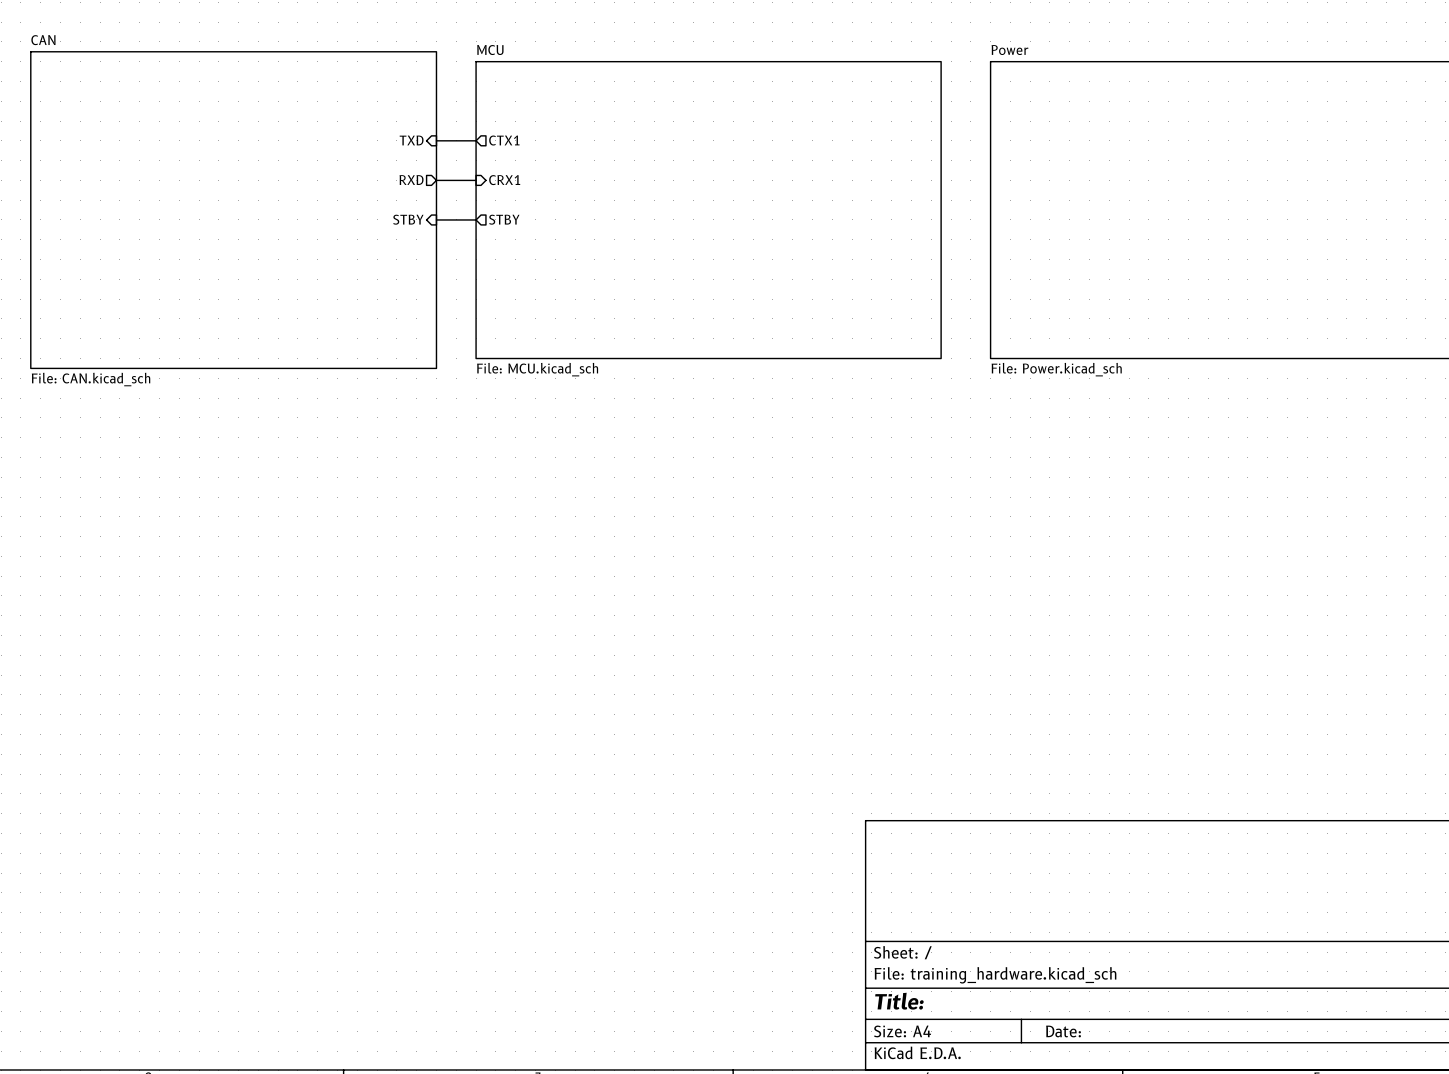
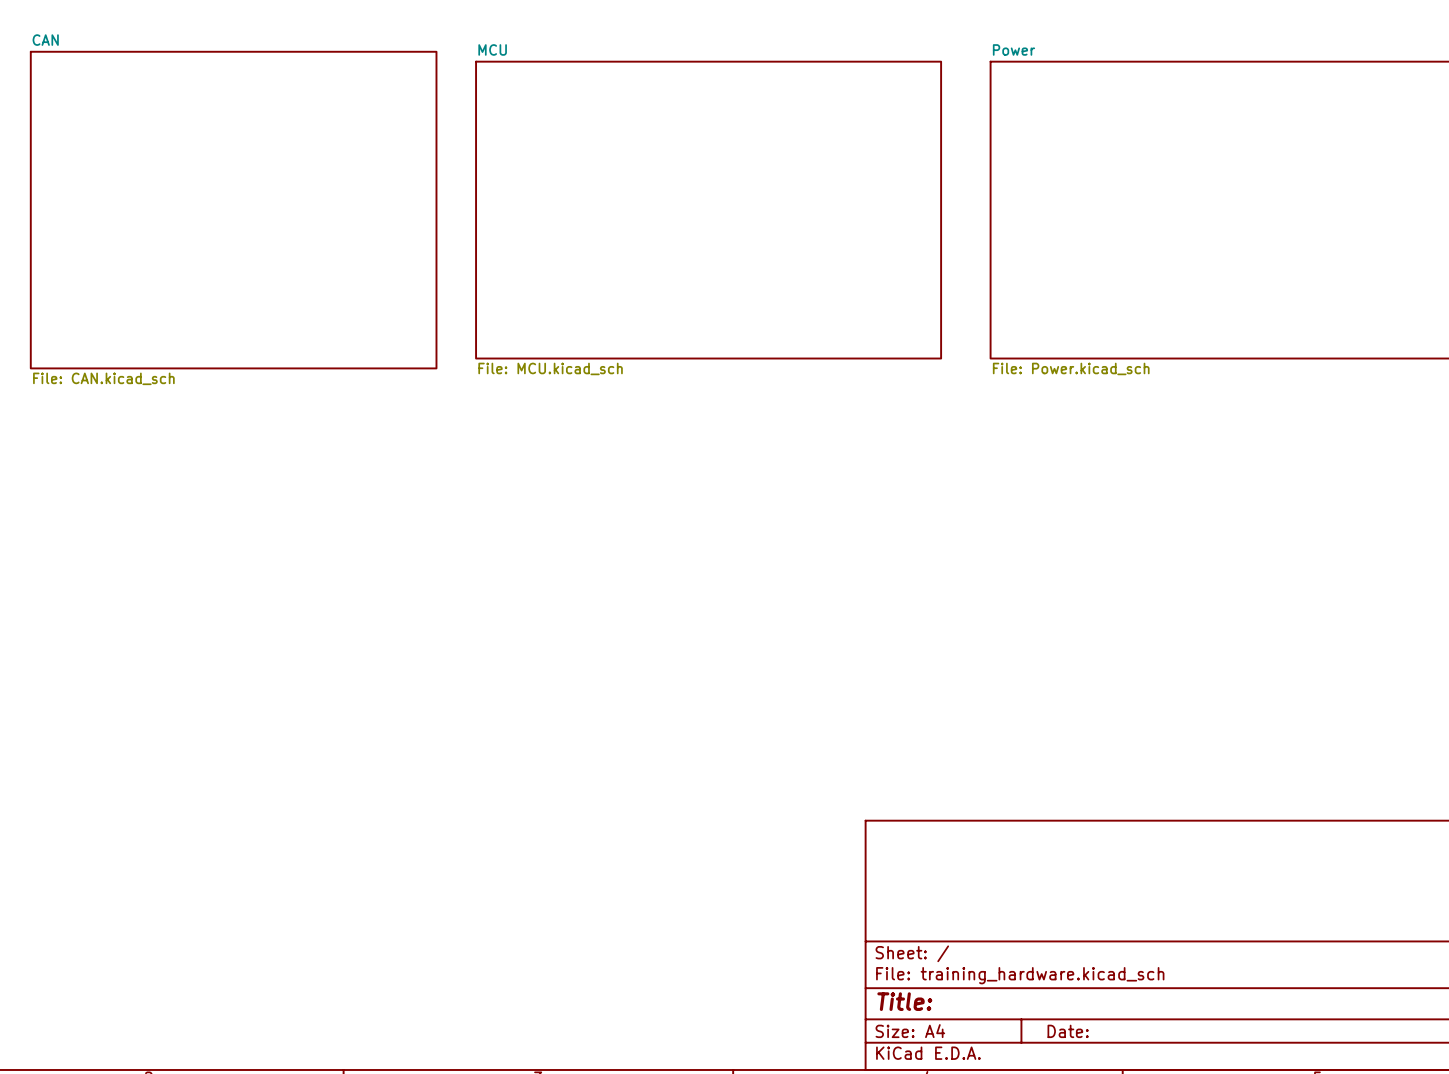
sheet pin: TXD (411, 140) -> none
wire: (436, 140) (476, 140) -> none
sheet pin: CTX1 (504, 140) -> none
sheet pin: RXD (411, 180) -> none
wire: (436, 180) (476, 180) -> none
sheet pin: CRX1 (504, 180) -> none
sheet pin: STBY (408, 219) -> none
wire: (436, 219) (476, 219) -> none
sheet pin: STBY (504, 219) -> none

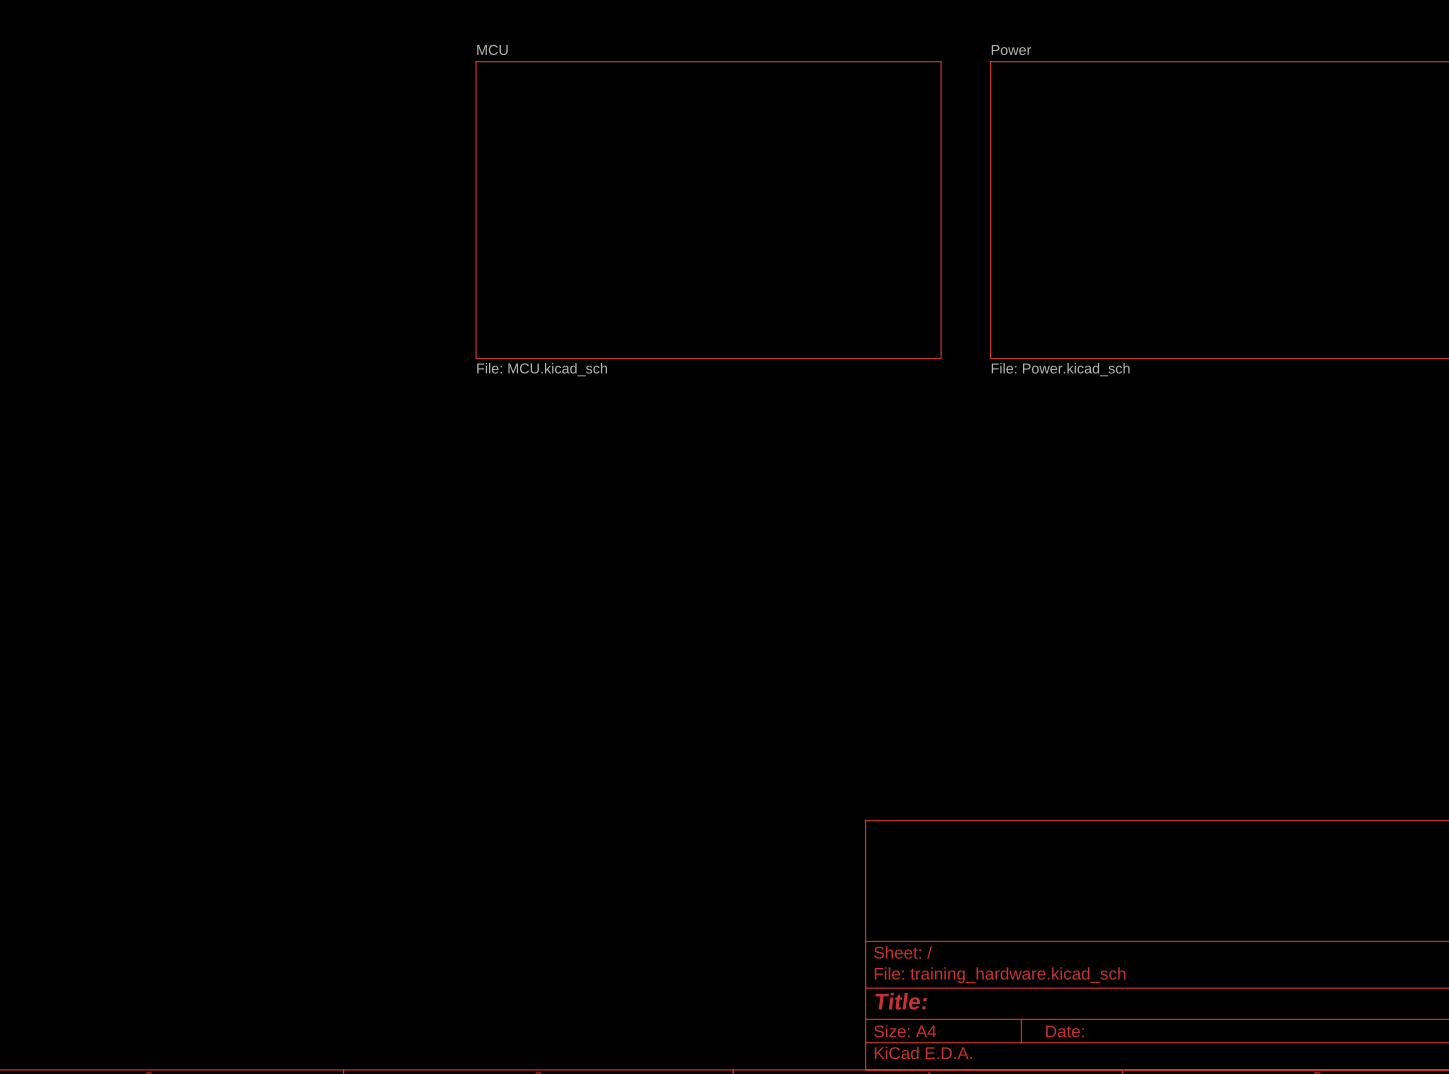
sheet CAN: File: CAN.kicad_sch (233, 210) -> none

